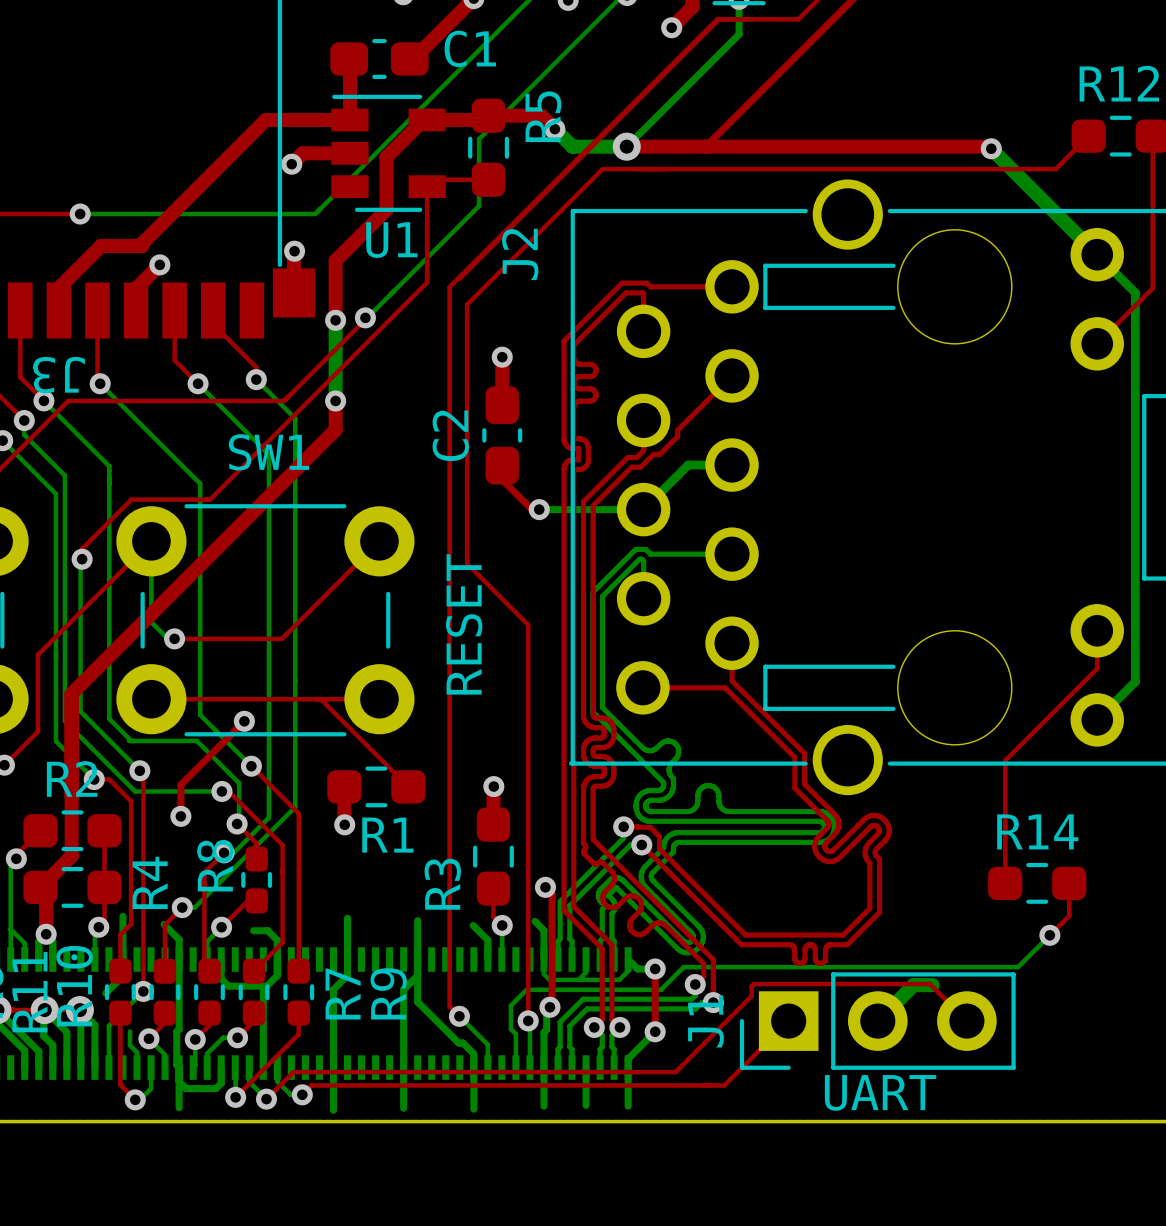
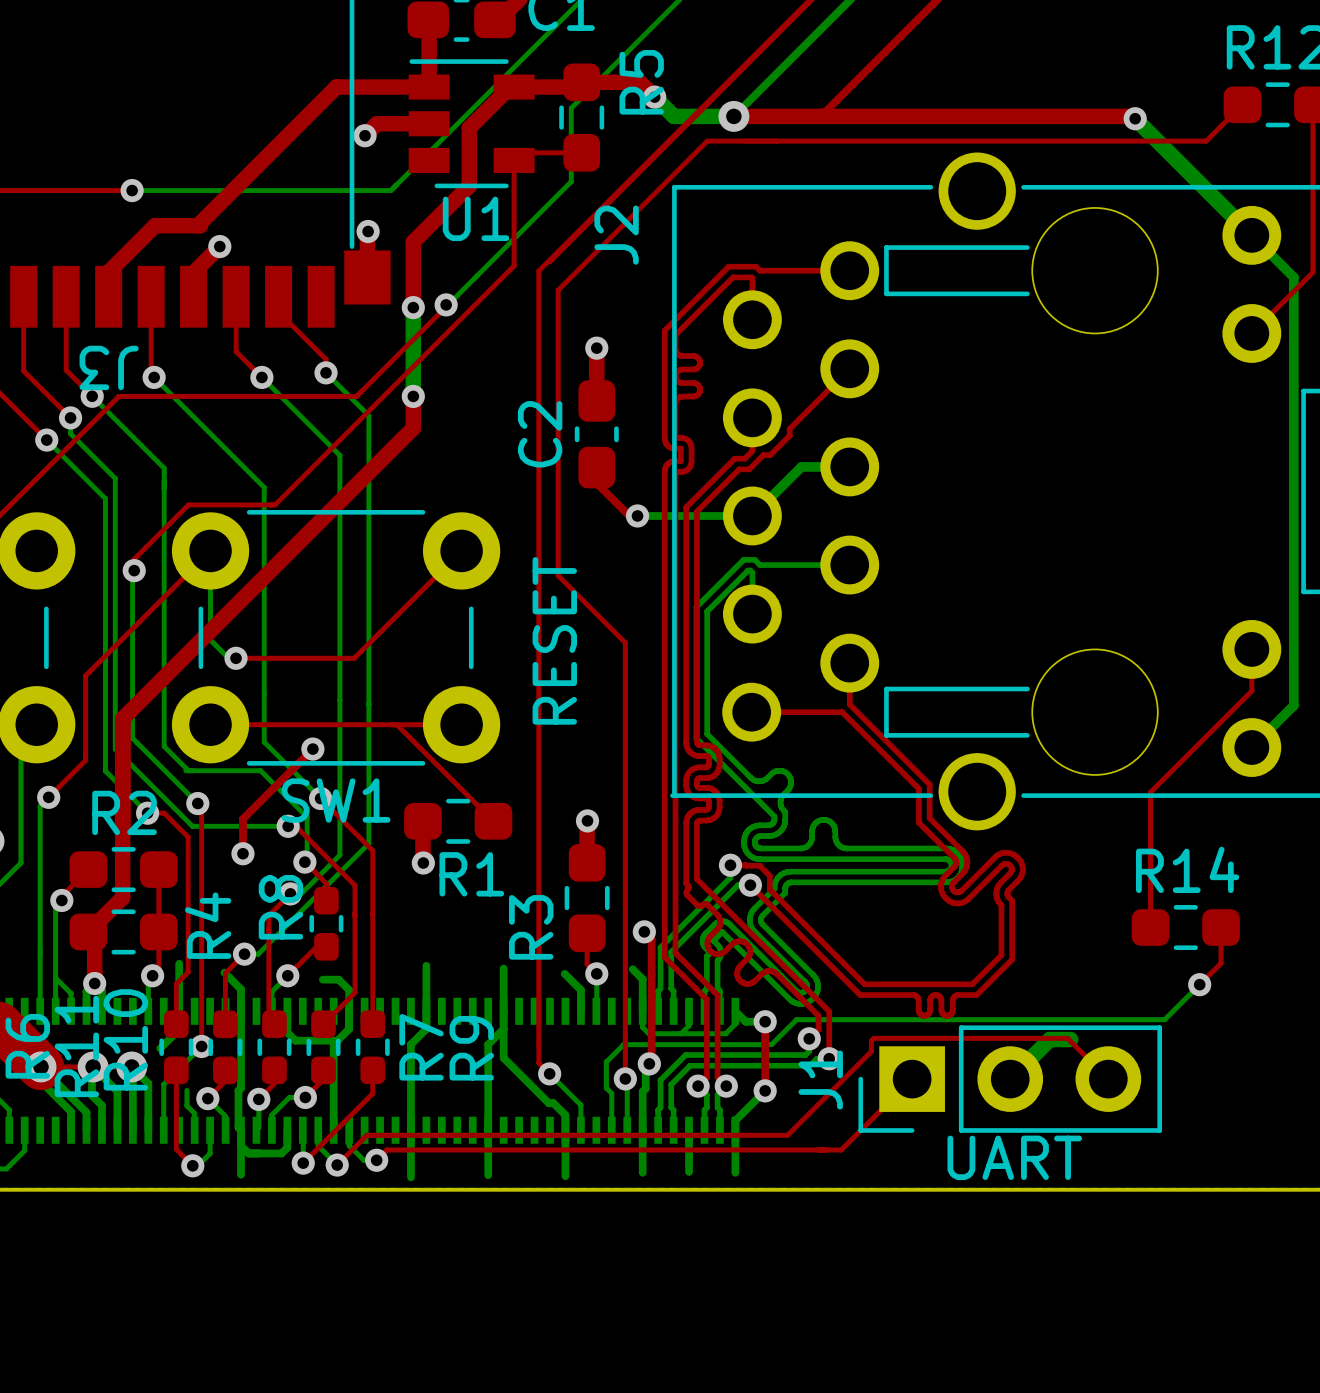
SW1 name position: SW1 (268, 452) -> SW1 (336, 800)

